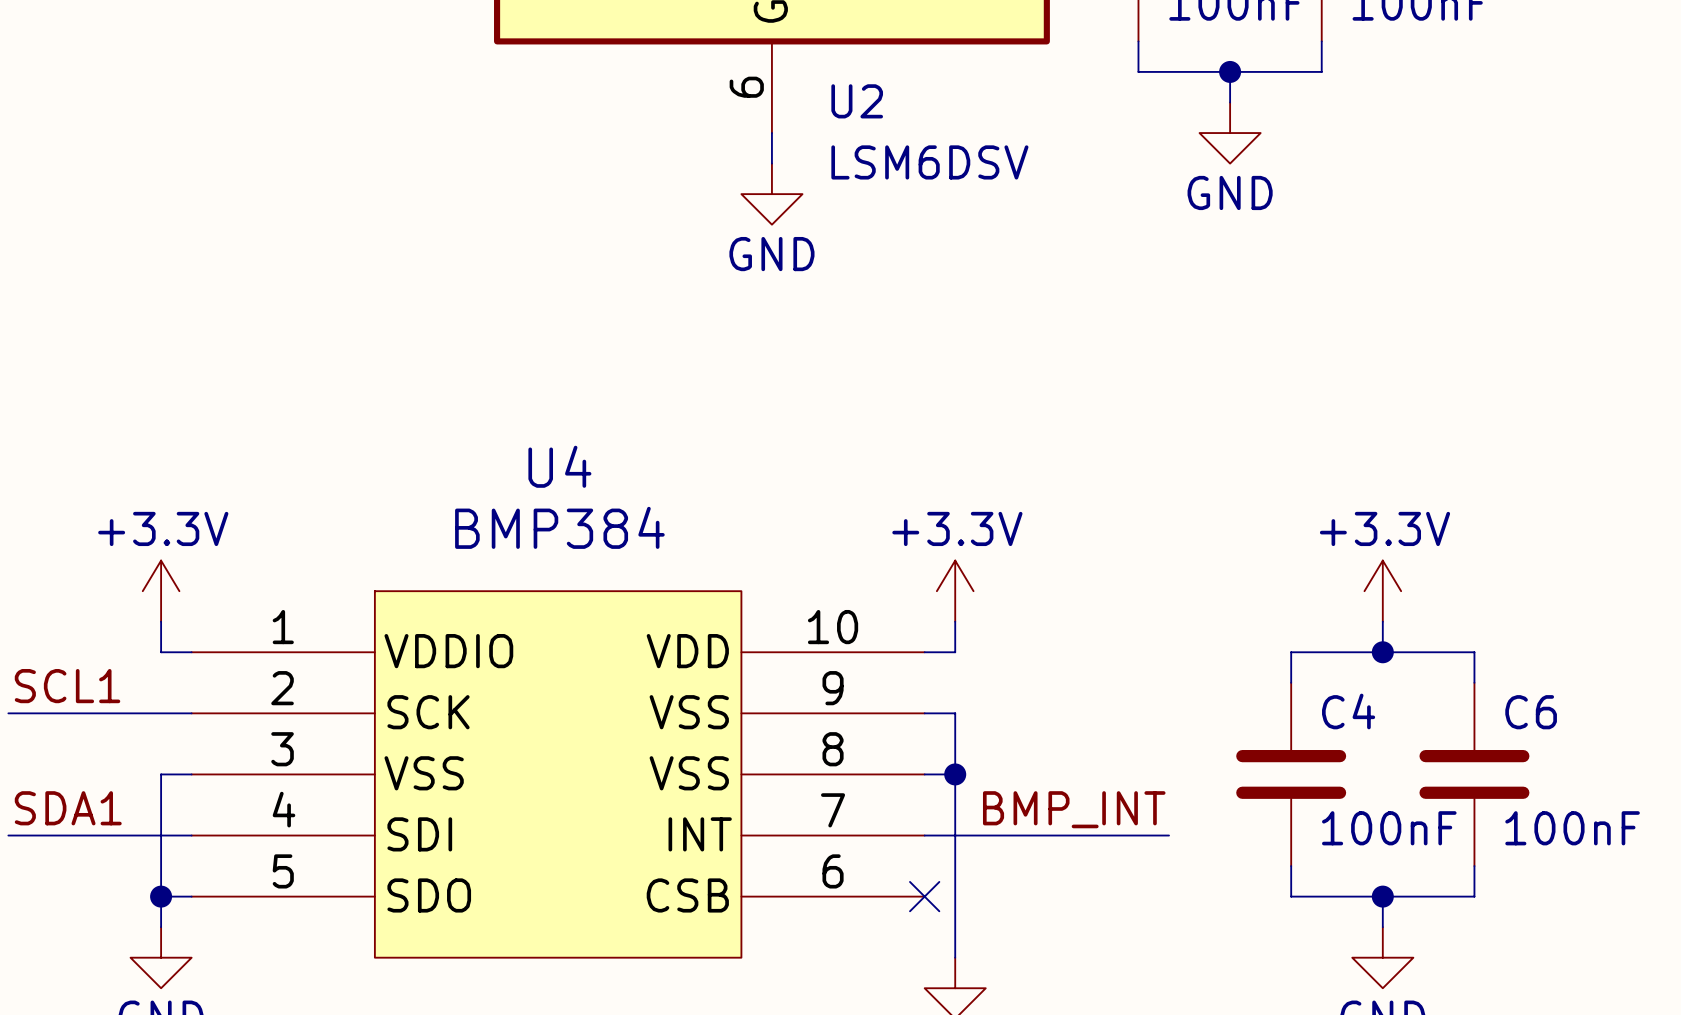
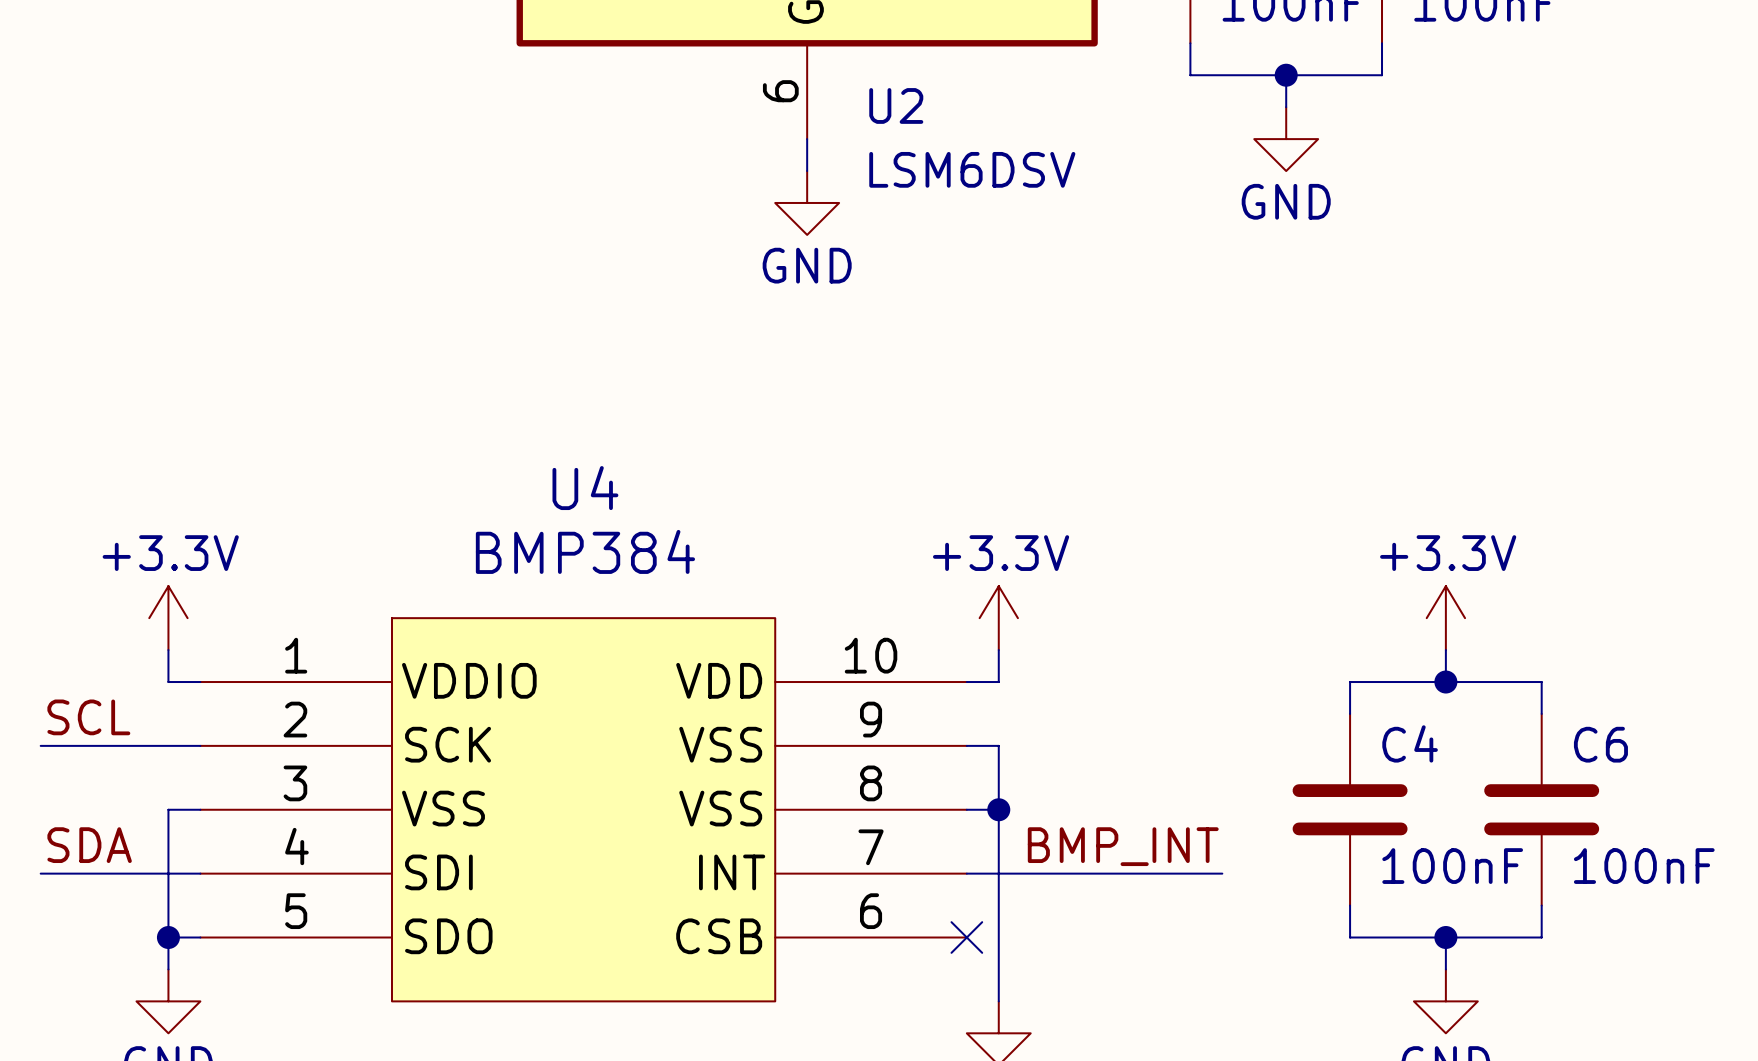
label: SCL1 (67, 686) -> SCL (88, 717)
wire: (8, 713) (38, 713) -> none
label: SDA1 (68, 808) -> SDA (89, 845)
wire: (8, 835) (38, 835) -> none

